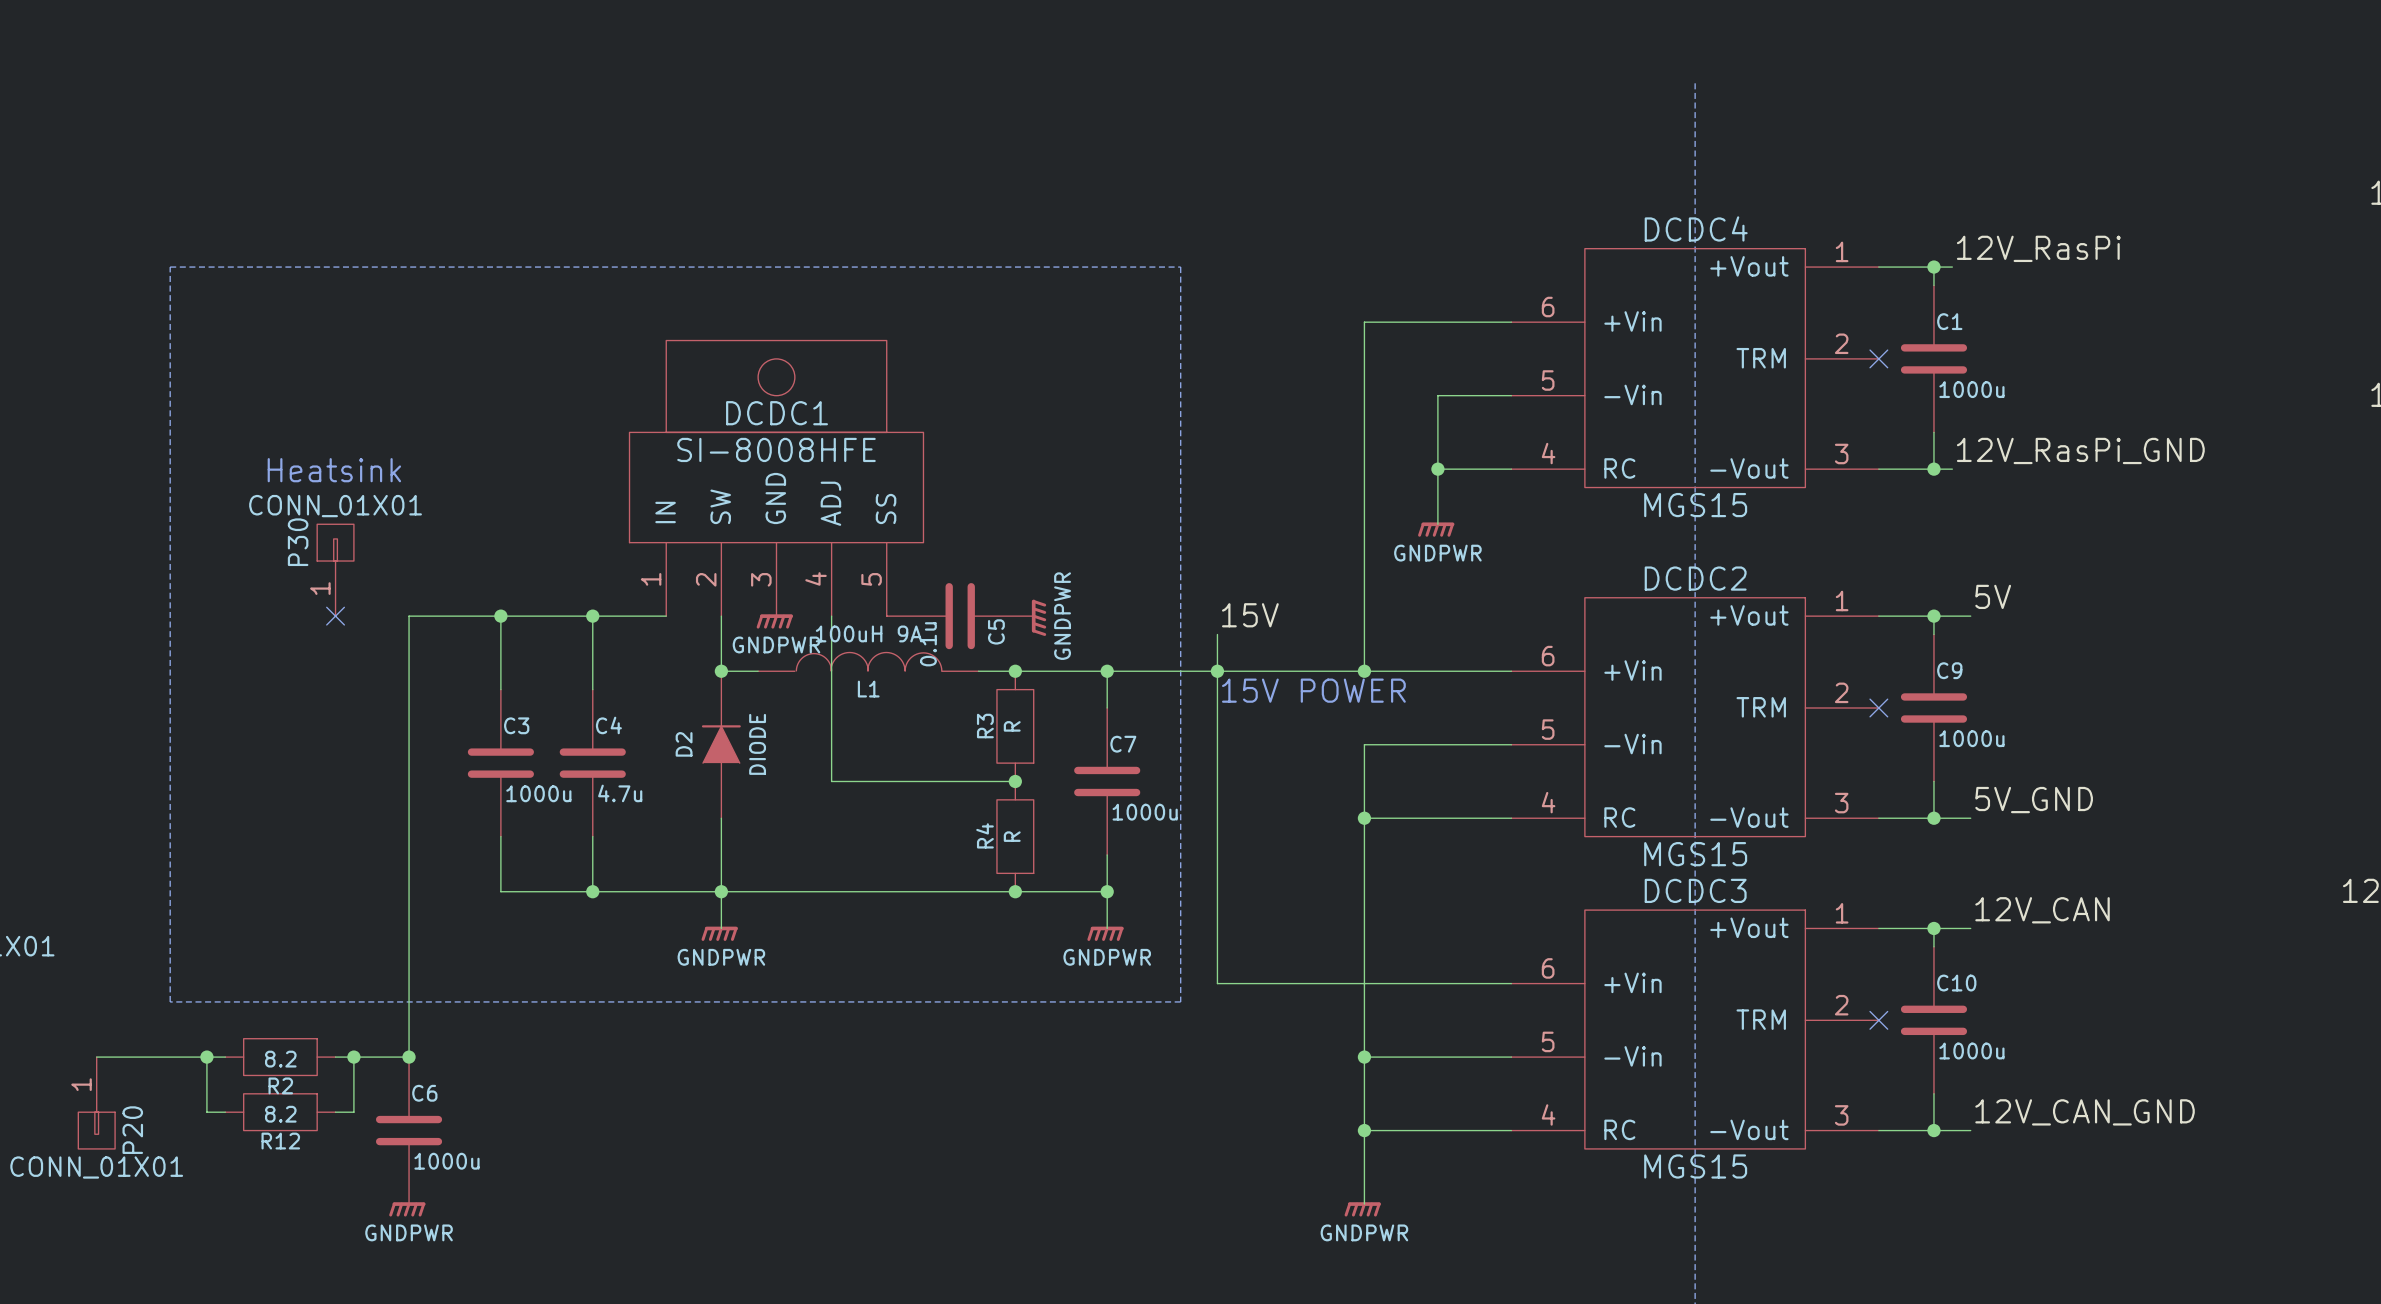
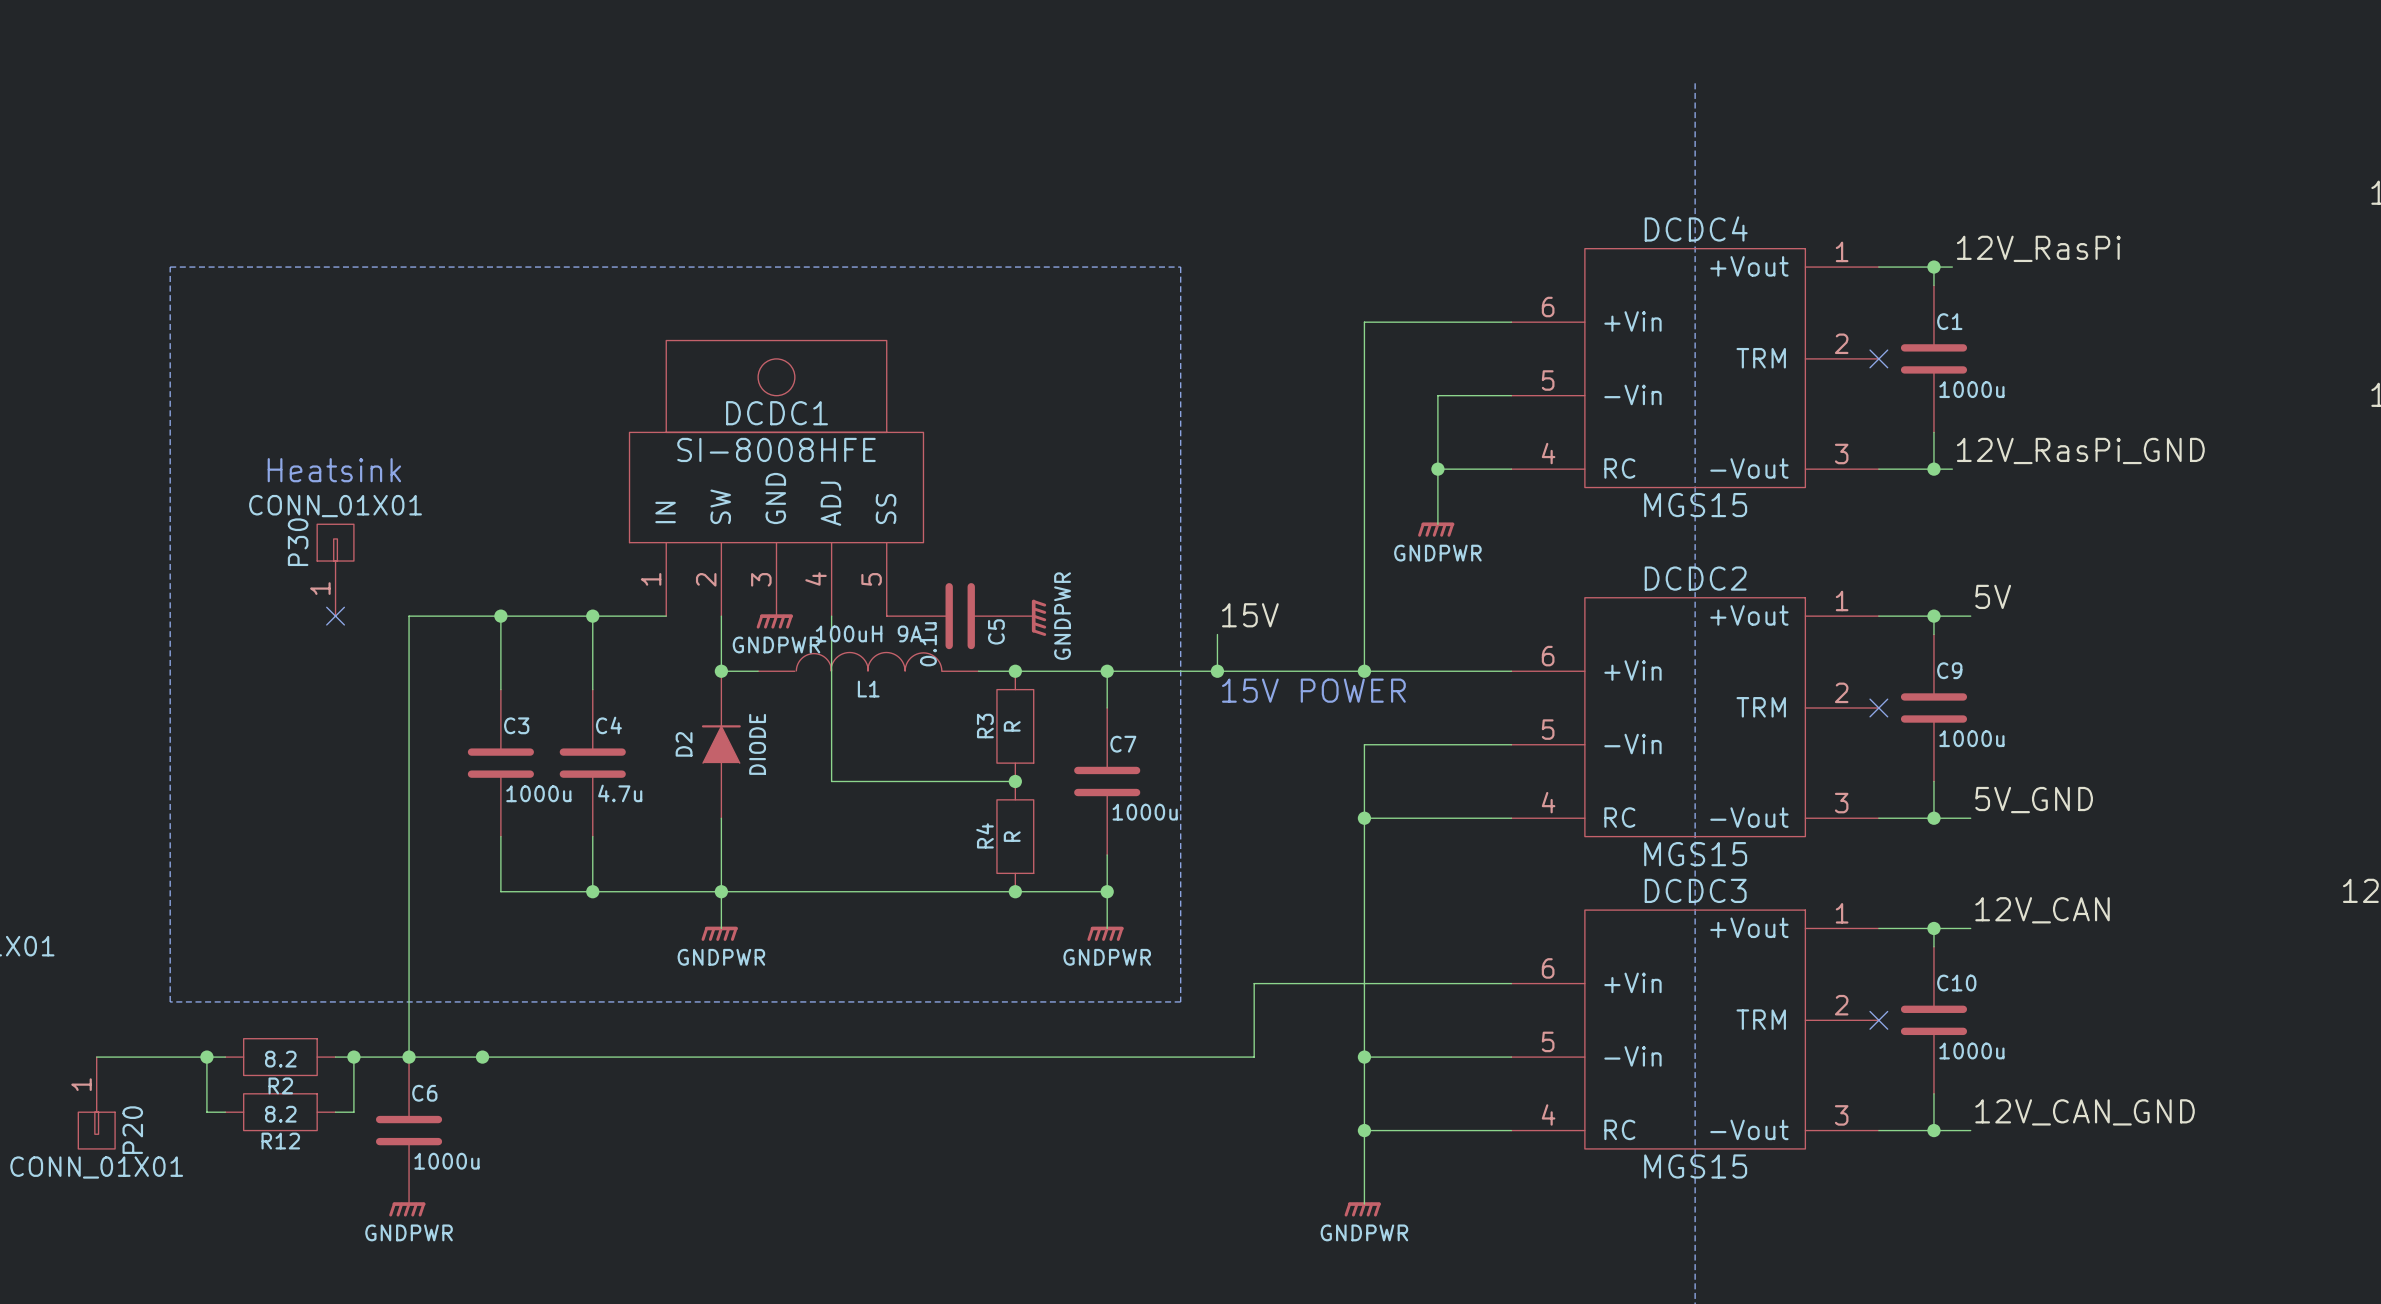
wire: (1217, 671) (1217, 983) (1254, 983) -> (409, 1057) (1254, 1057) (1254, 983)
junction: none -> (482, 1057)

